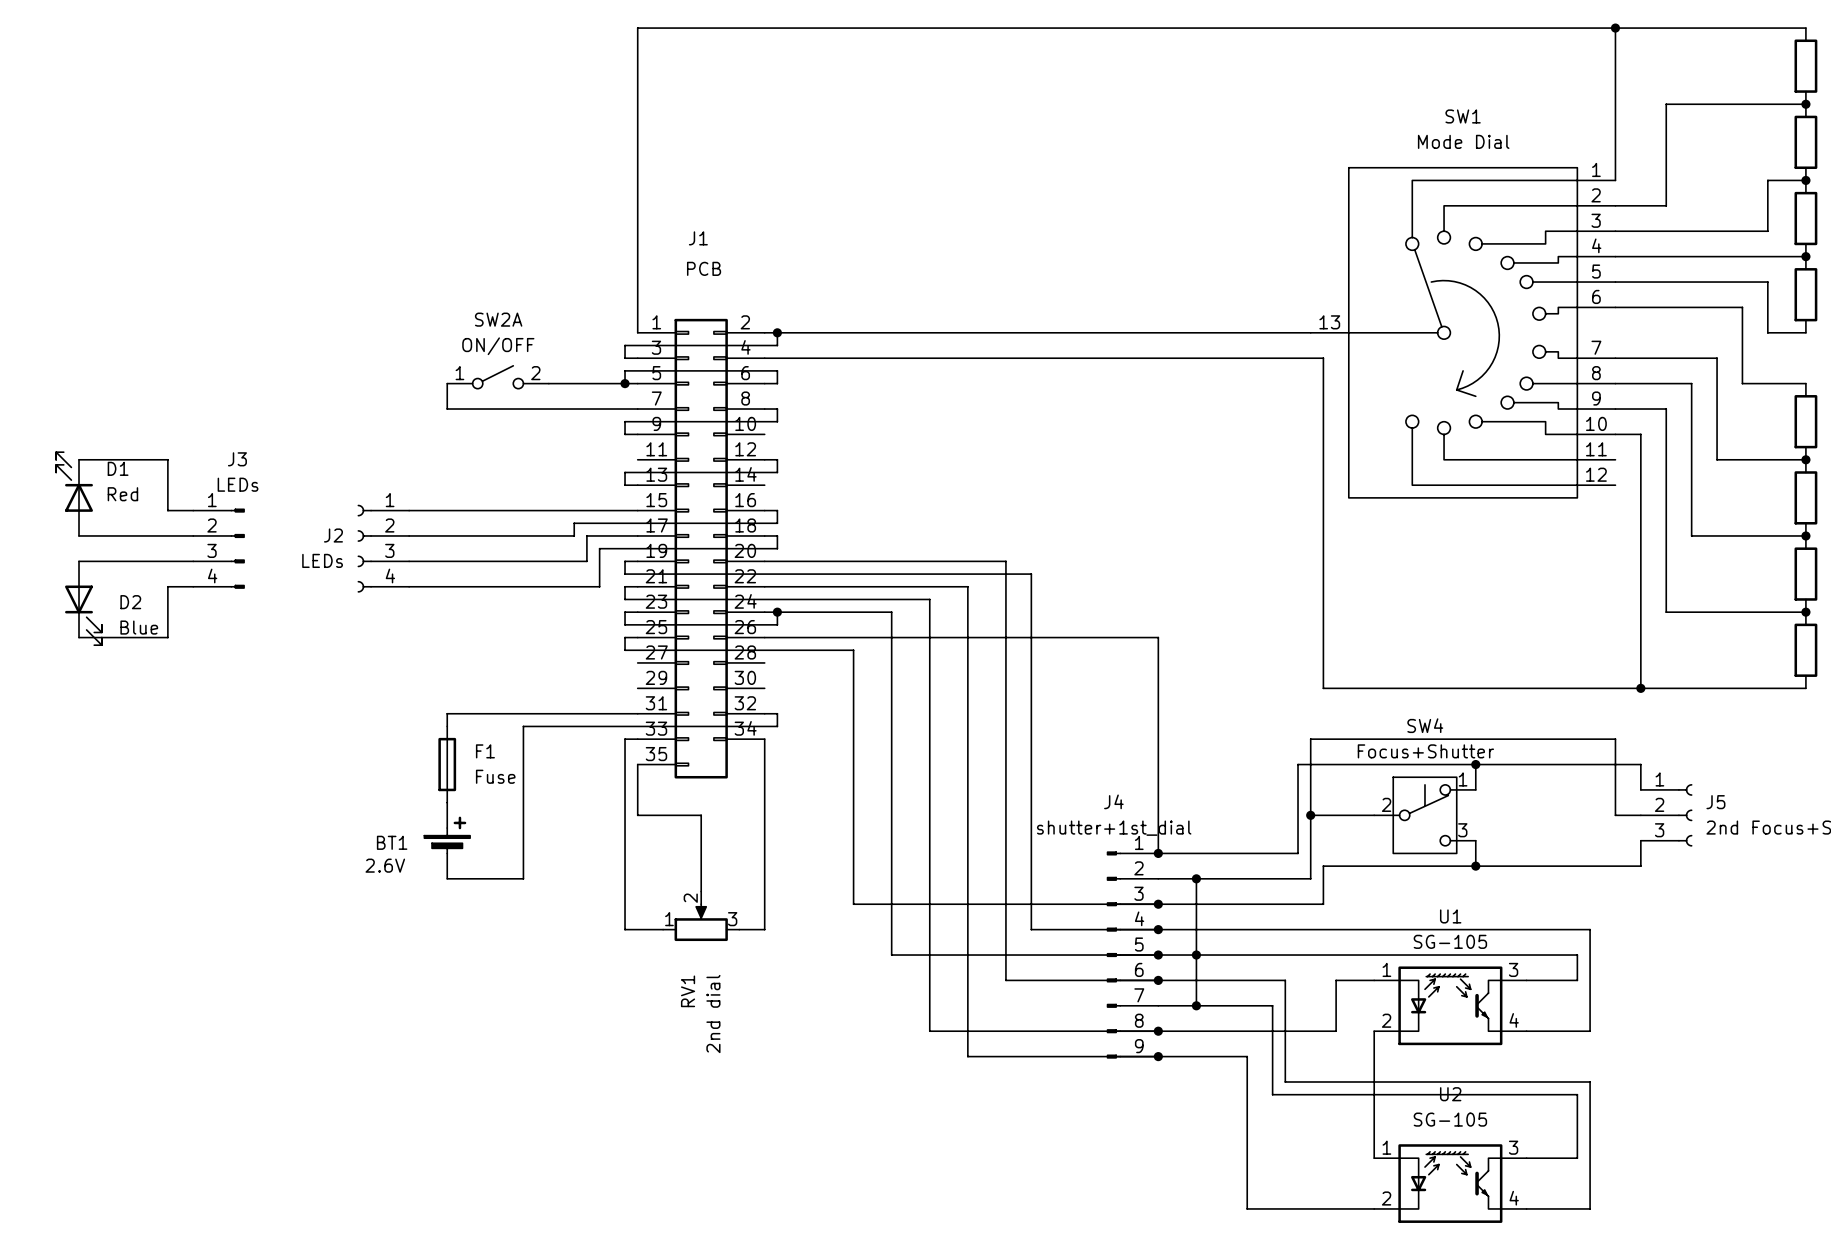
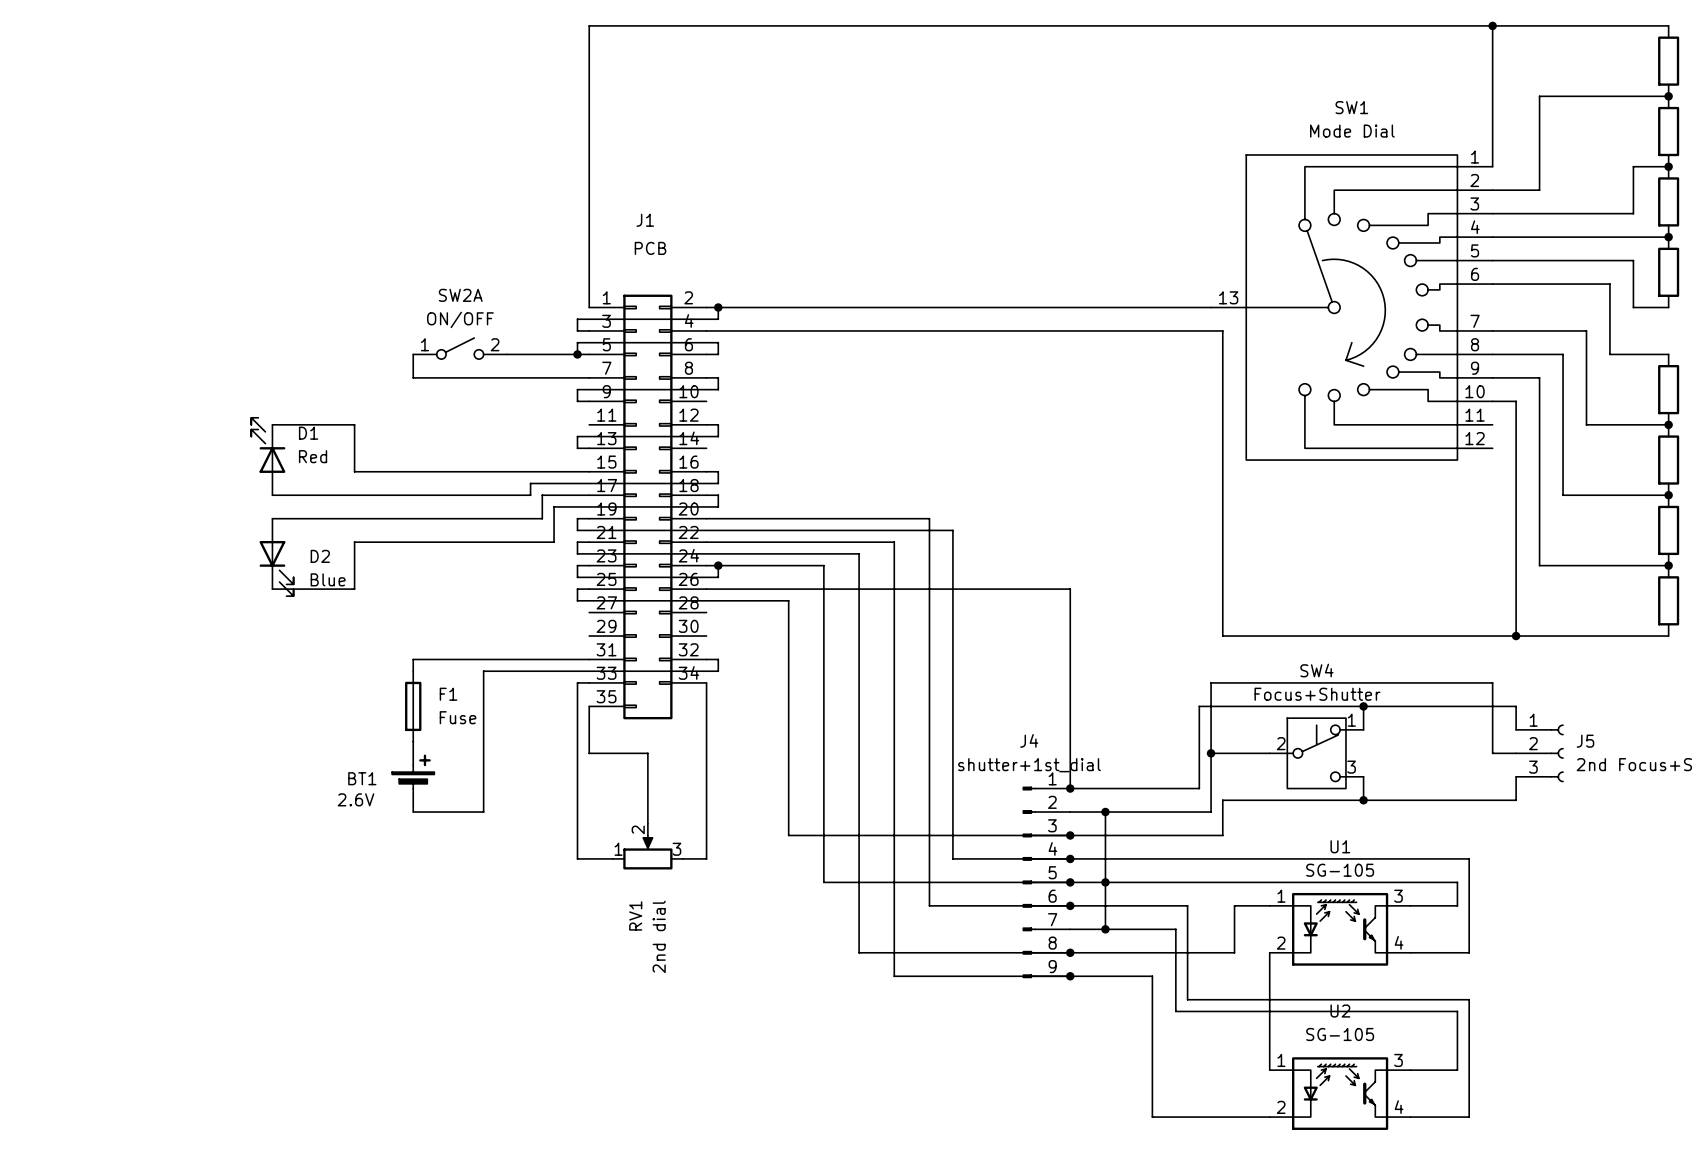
wire: (79, 459) (167, 459) (167, 510) (193, 510) -> (272, 424) (354, 424) (354, 471) (378, 471)
D1 position: (74, 494) -> (268, 456)
wire: (79, 535) (193, 535) -> (272, 495) (378, 495)
J3: LEDs (219, 548) -> none
J2: LEDs (383, 548) -> none
wire: (79, 561) (193, 561) -> (272, 518) (378, 518)
wire: (193, 586) (167, 586) (167, 637) (79, 637) -> (378, 542) (354, 542) (354, 589) (272, 589)
D2 position: (83, 603) -> (276, 557)

